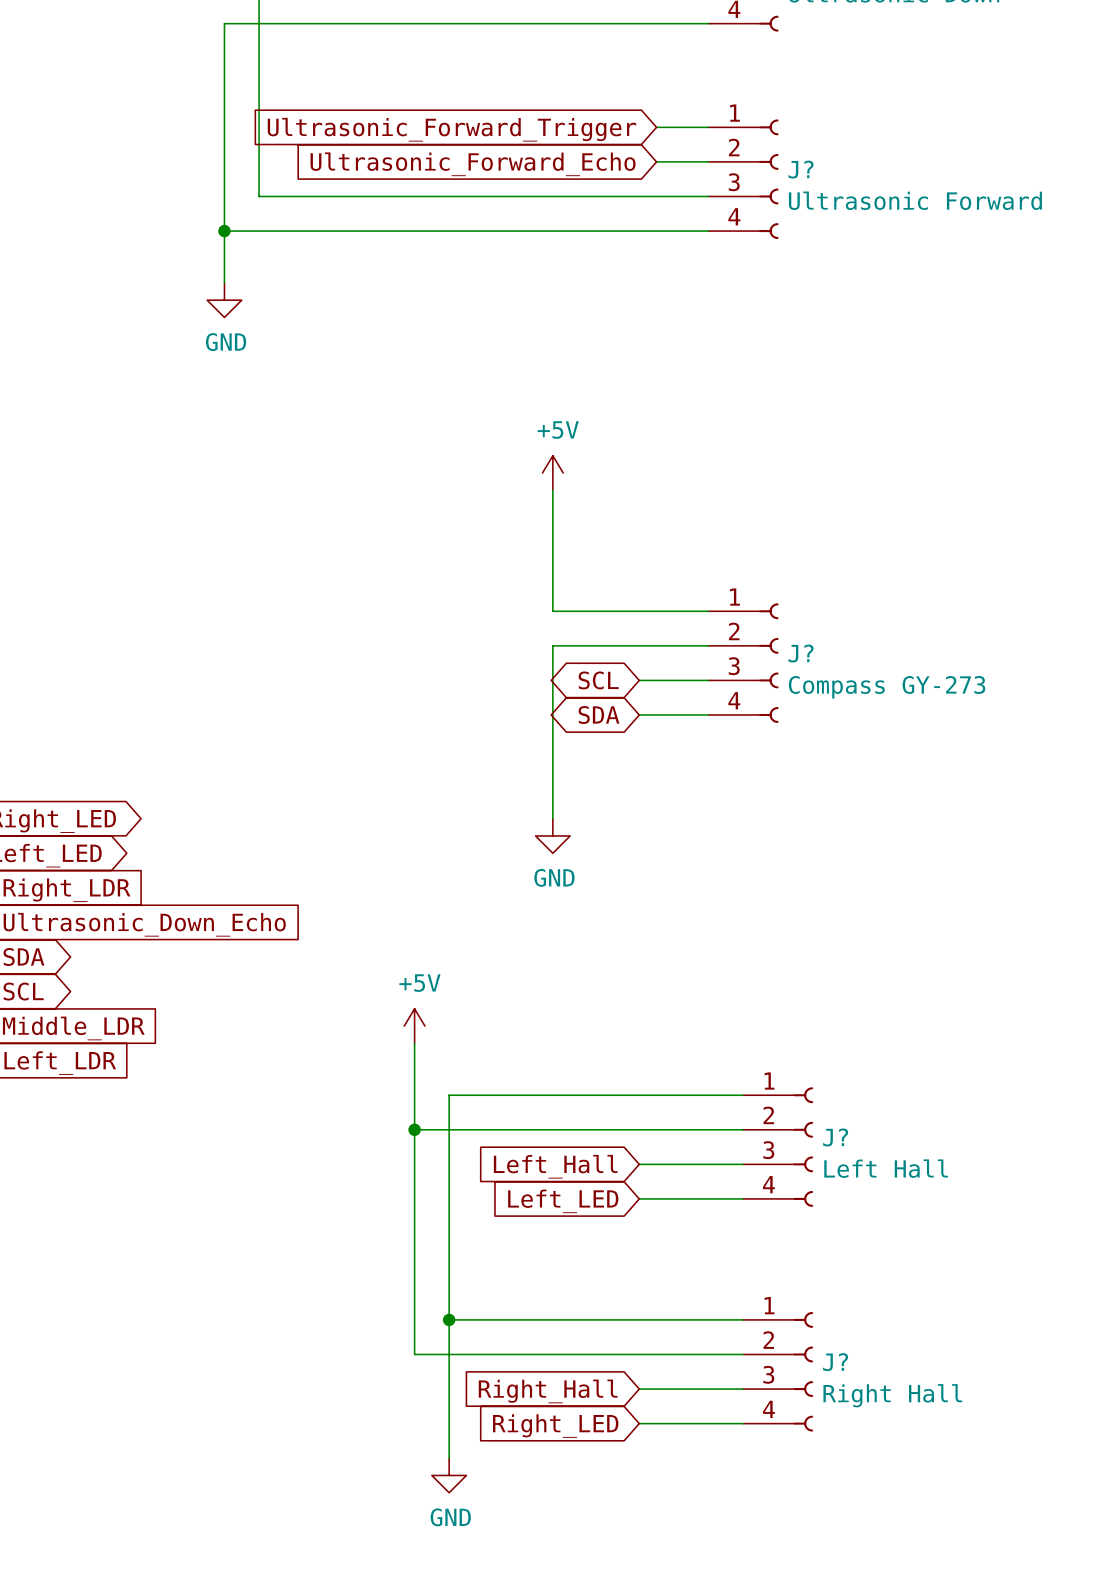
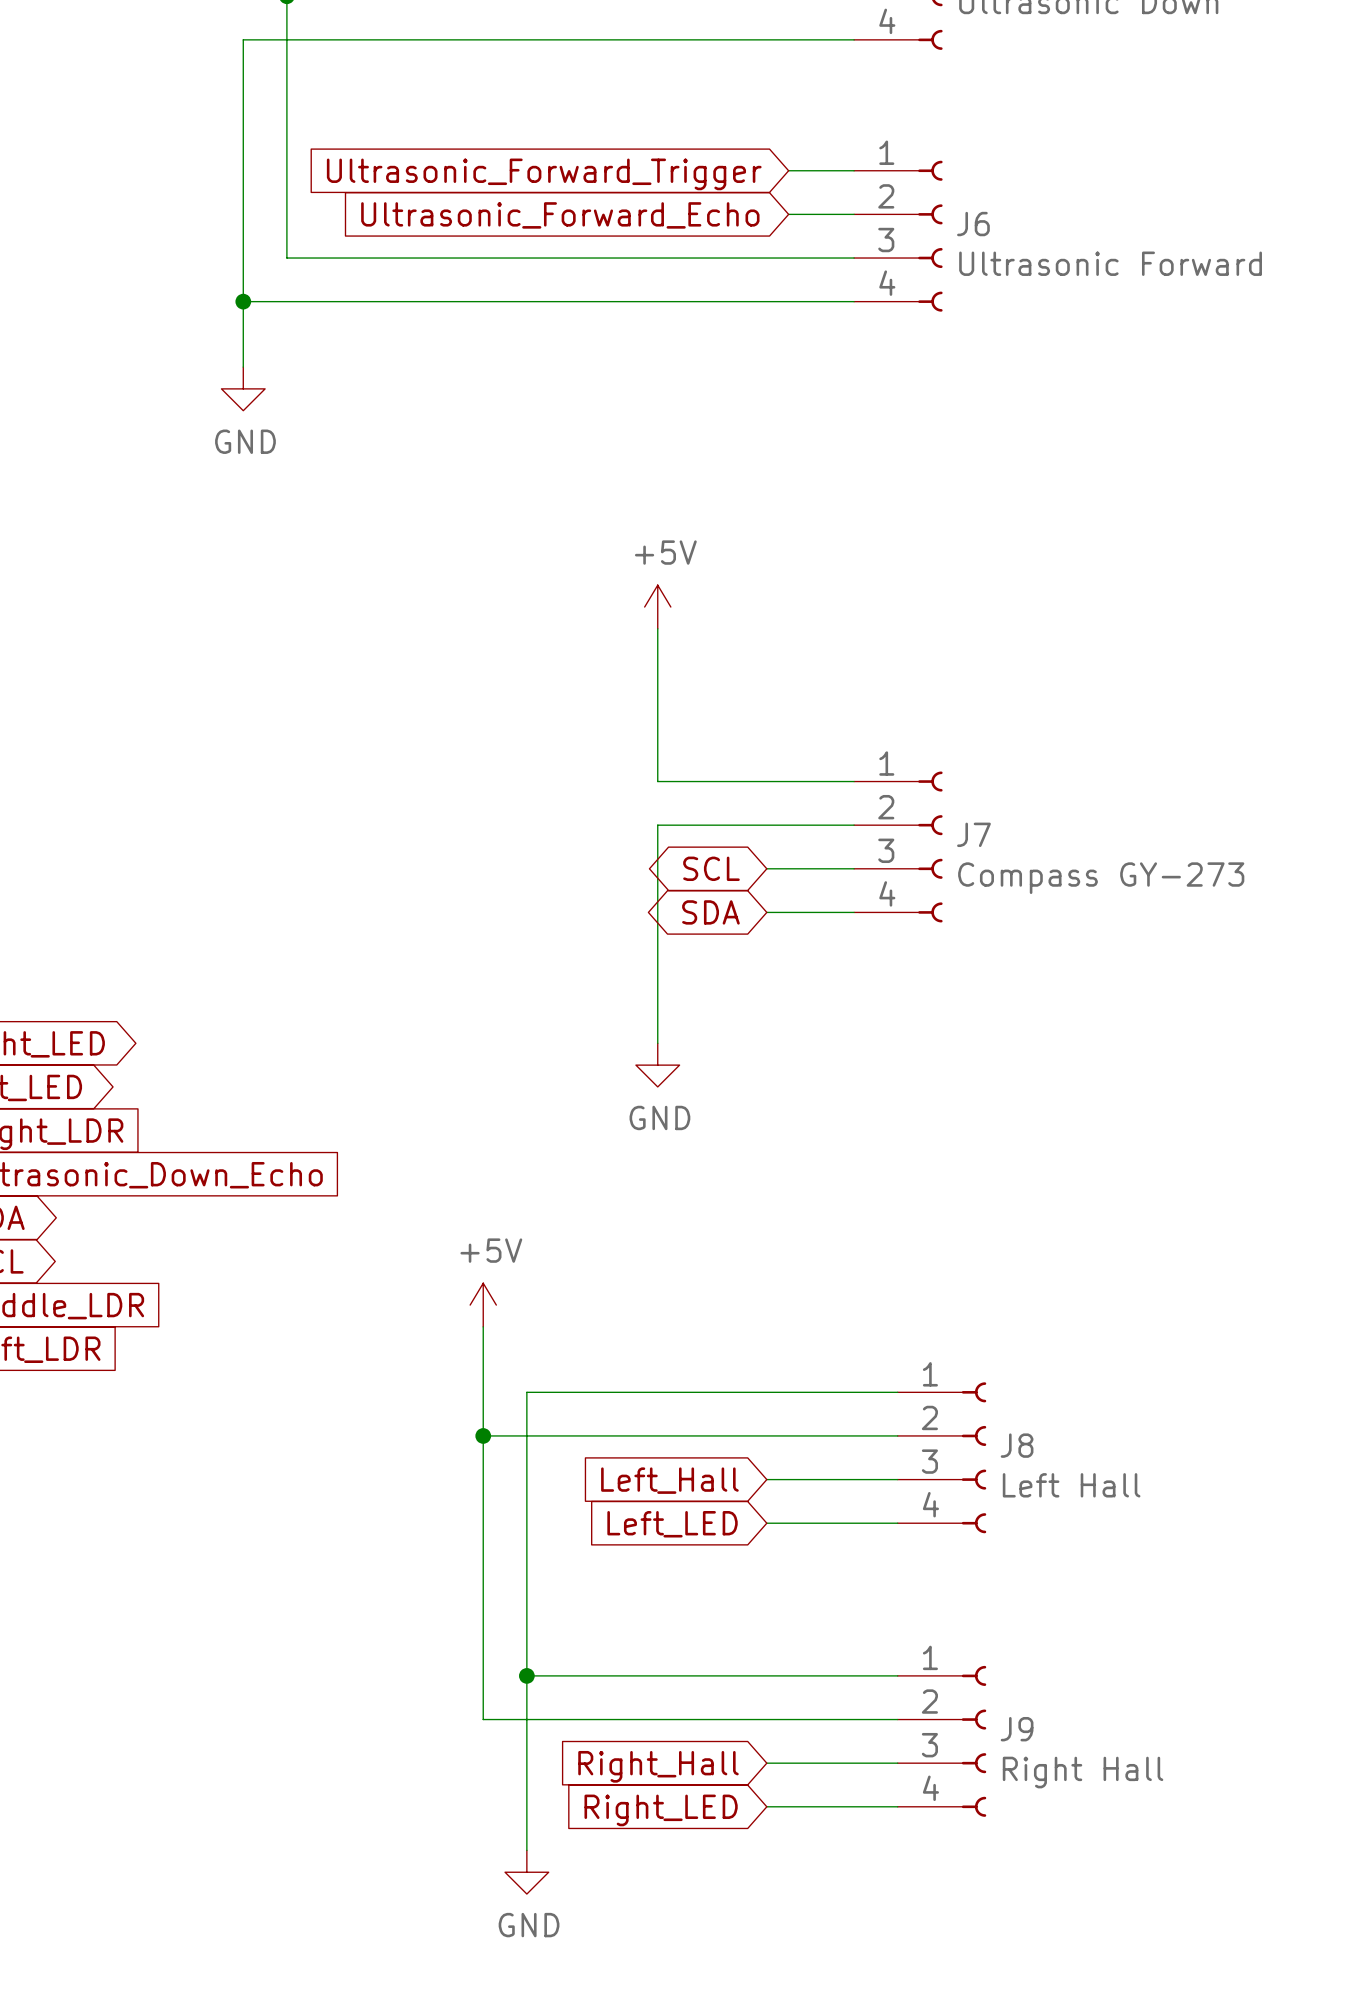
J? name: J? (801, 169) -> J6 (973, 224)
J? name: J? (801, 653) -> J7 (973, 834)
J? name: J? (835, 1137) -> J8 (1017, 1445)
J? name: J? (835, 1362) -> J9 (1017, 1729)

